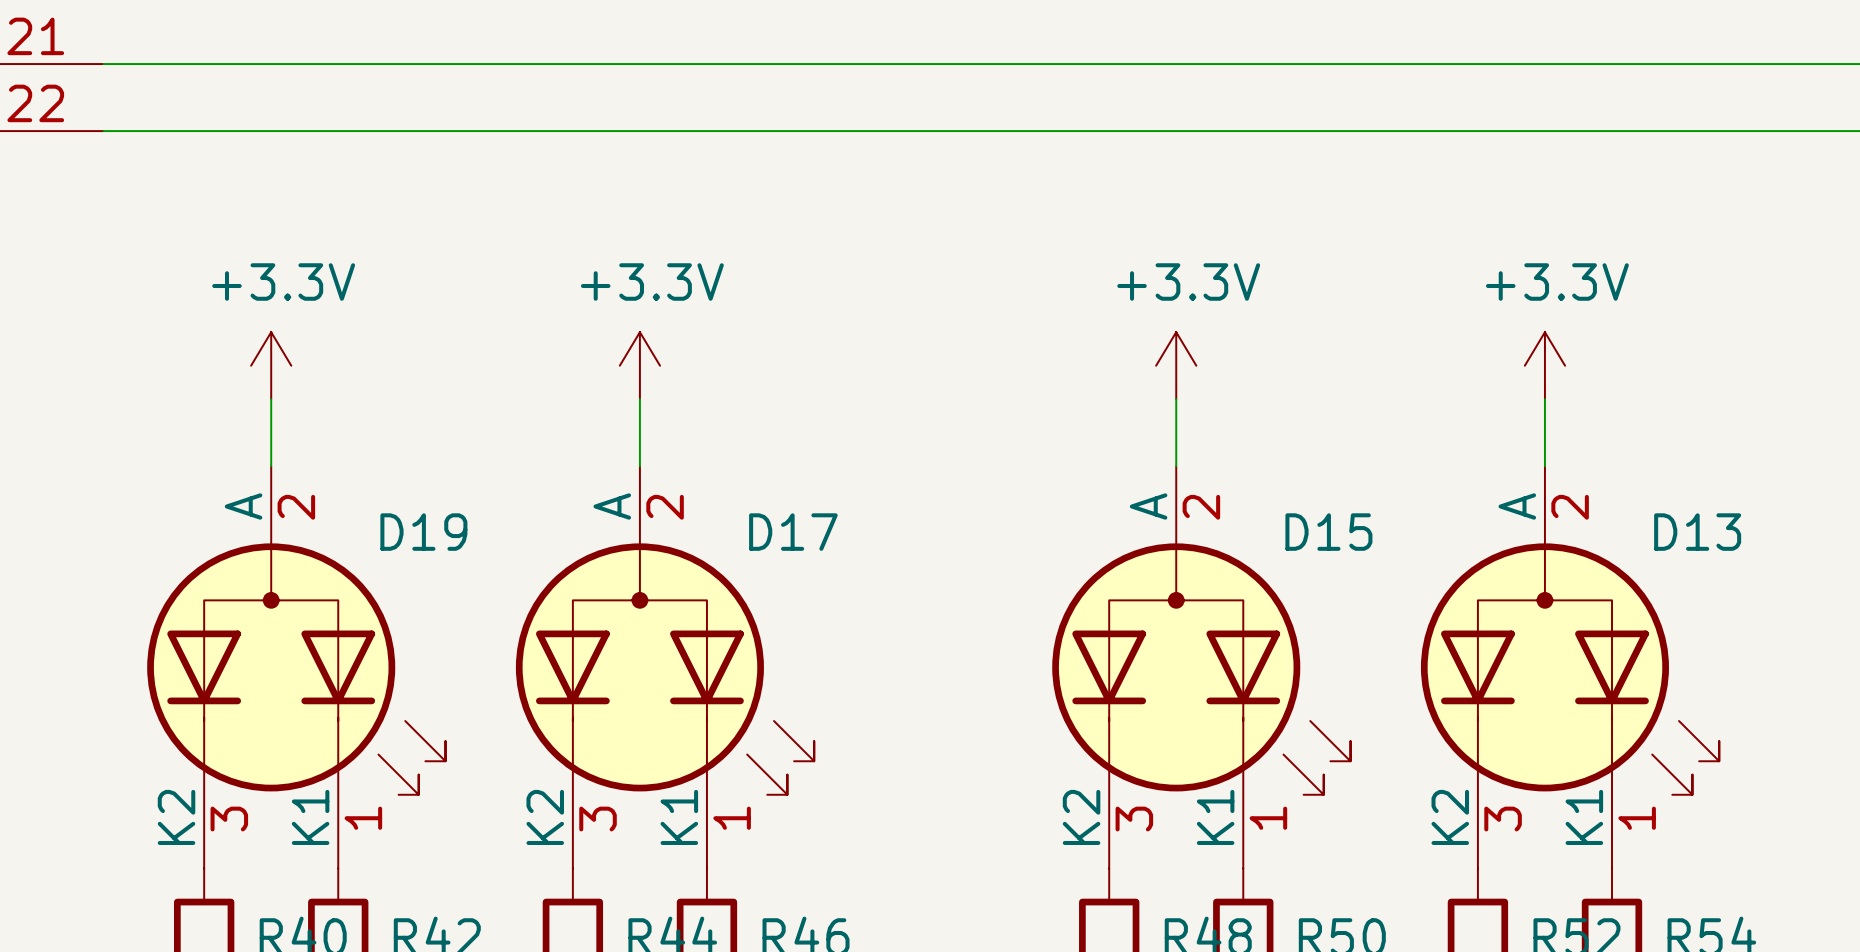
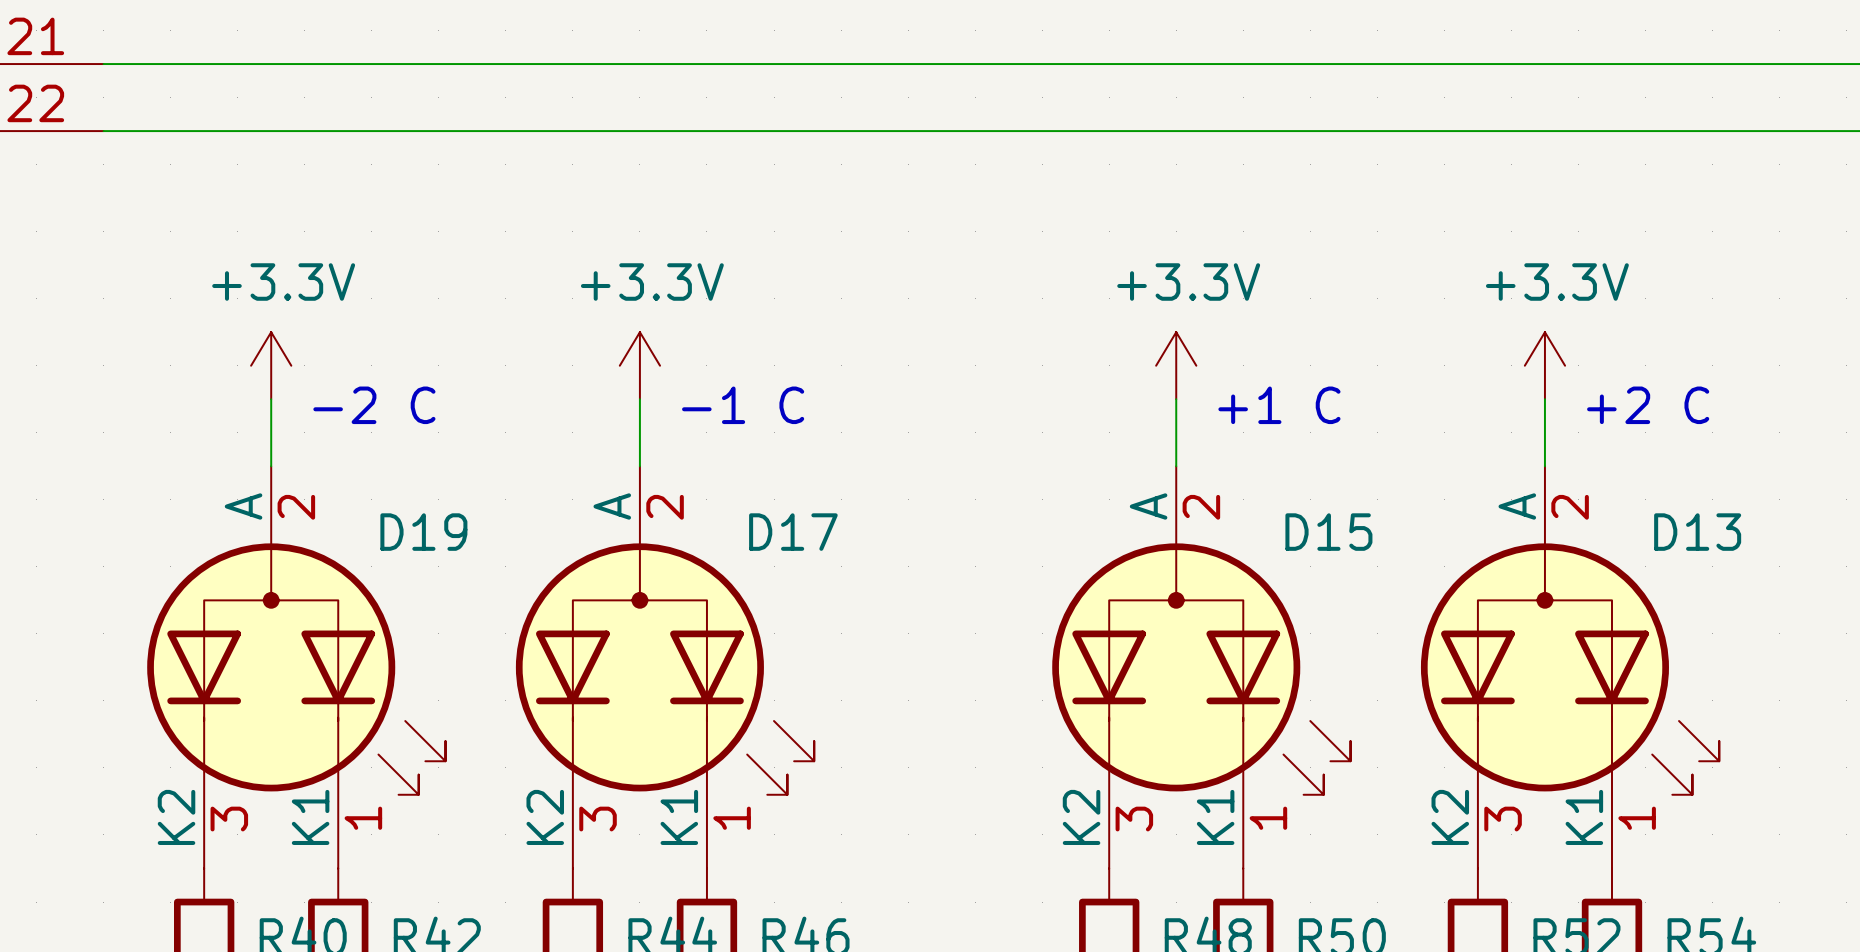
text: none -> -2 C (374, 405)
text: none -> -1 C (743, 405)
text: none -> +1 C (1279, 405)
text: none -> +2 C (1648, 405)

